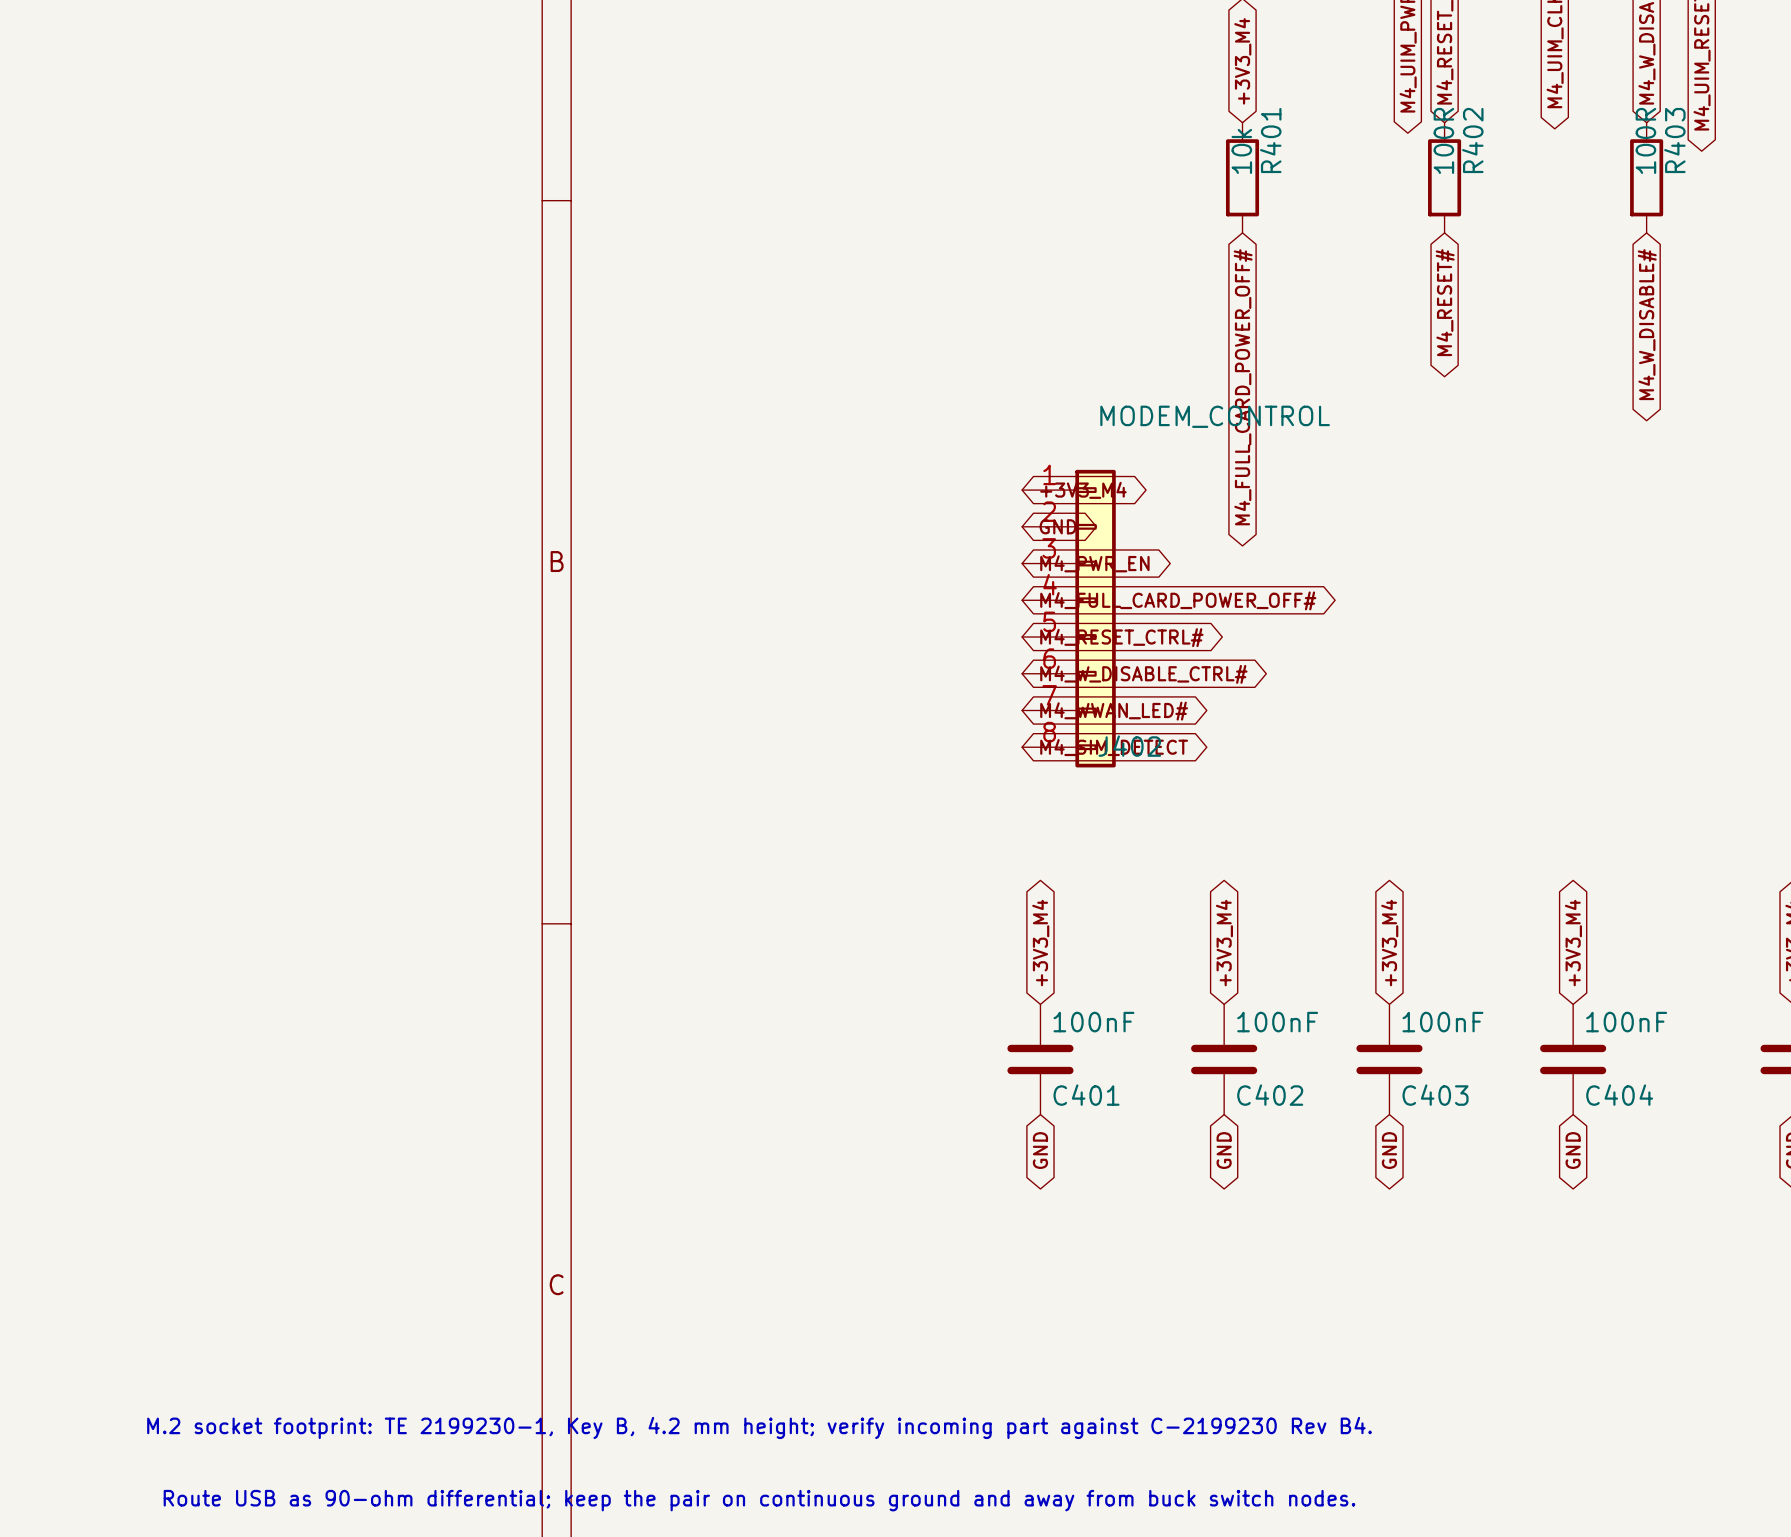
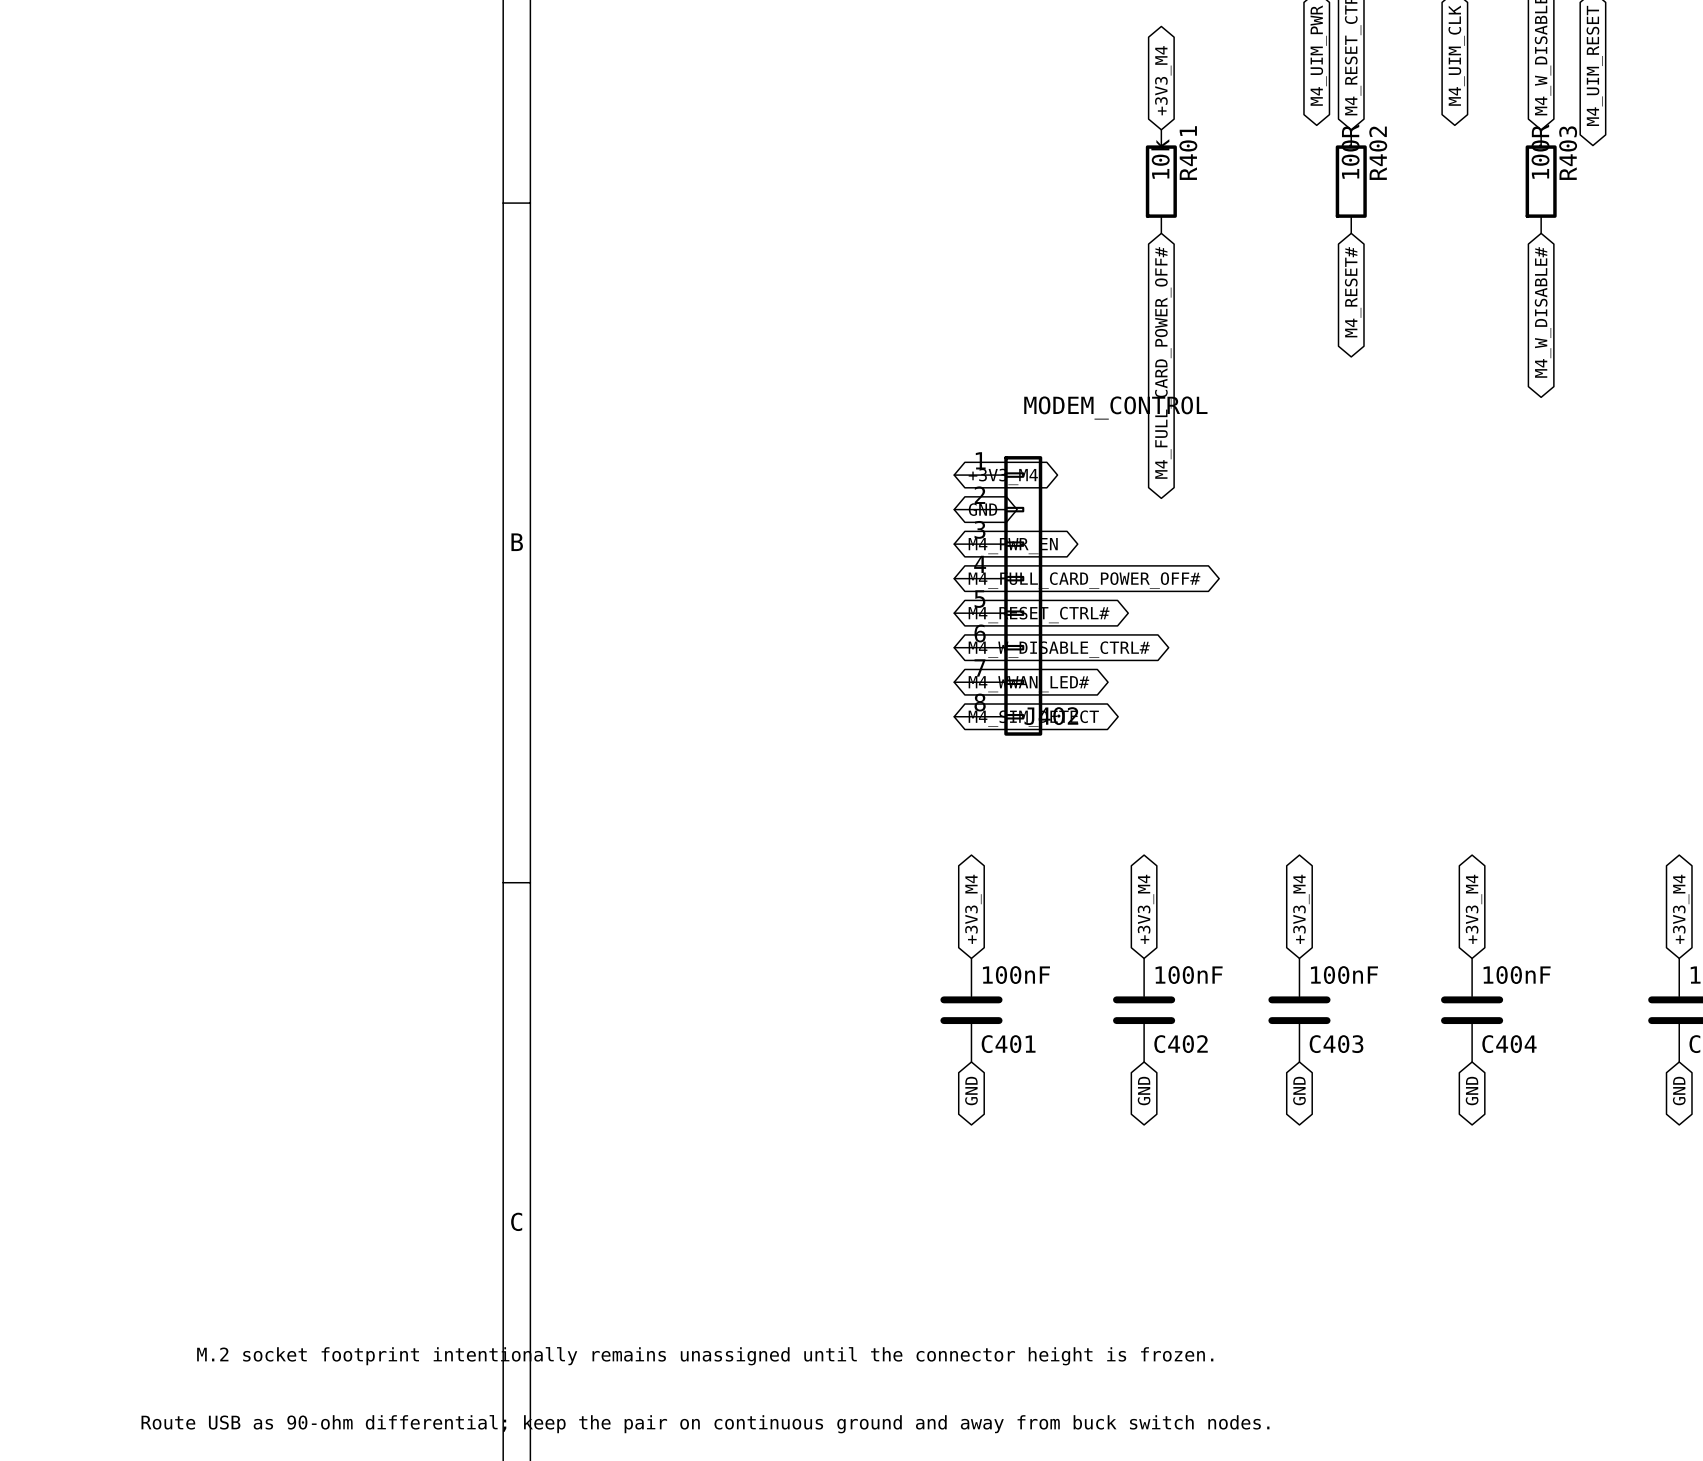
text: M.2 socket footprint: TE 2199230-1, Key B, 4.2 mm height; verify incoming part against C-2199230 Rev B4. (759, 1427) -> M.2 socket footprint intentionally remains unassigned until the connector height is frozen. (705, 1356)

